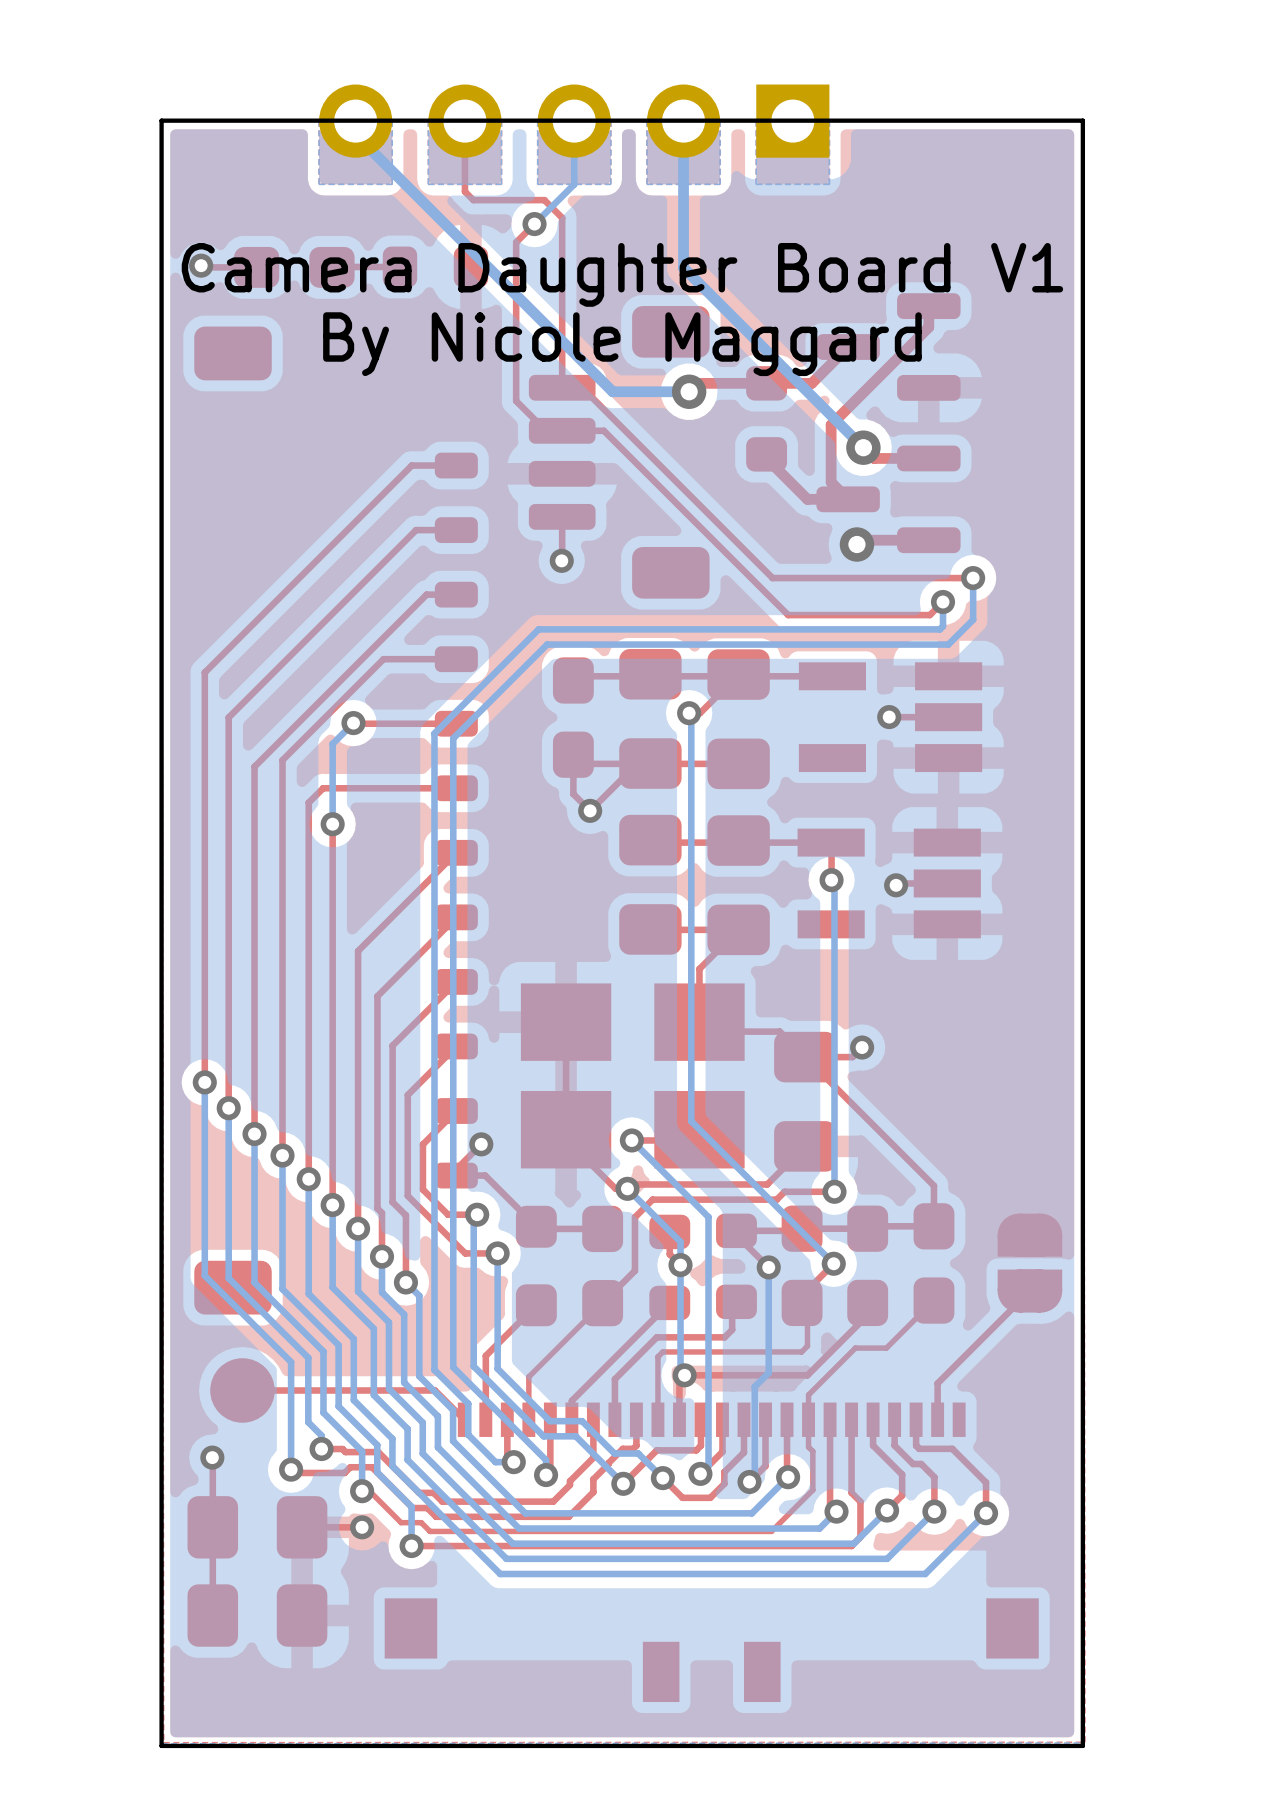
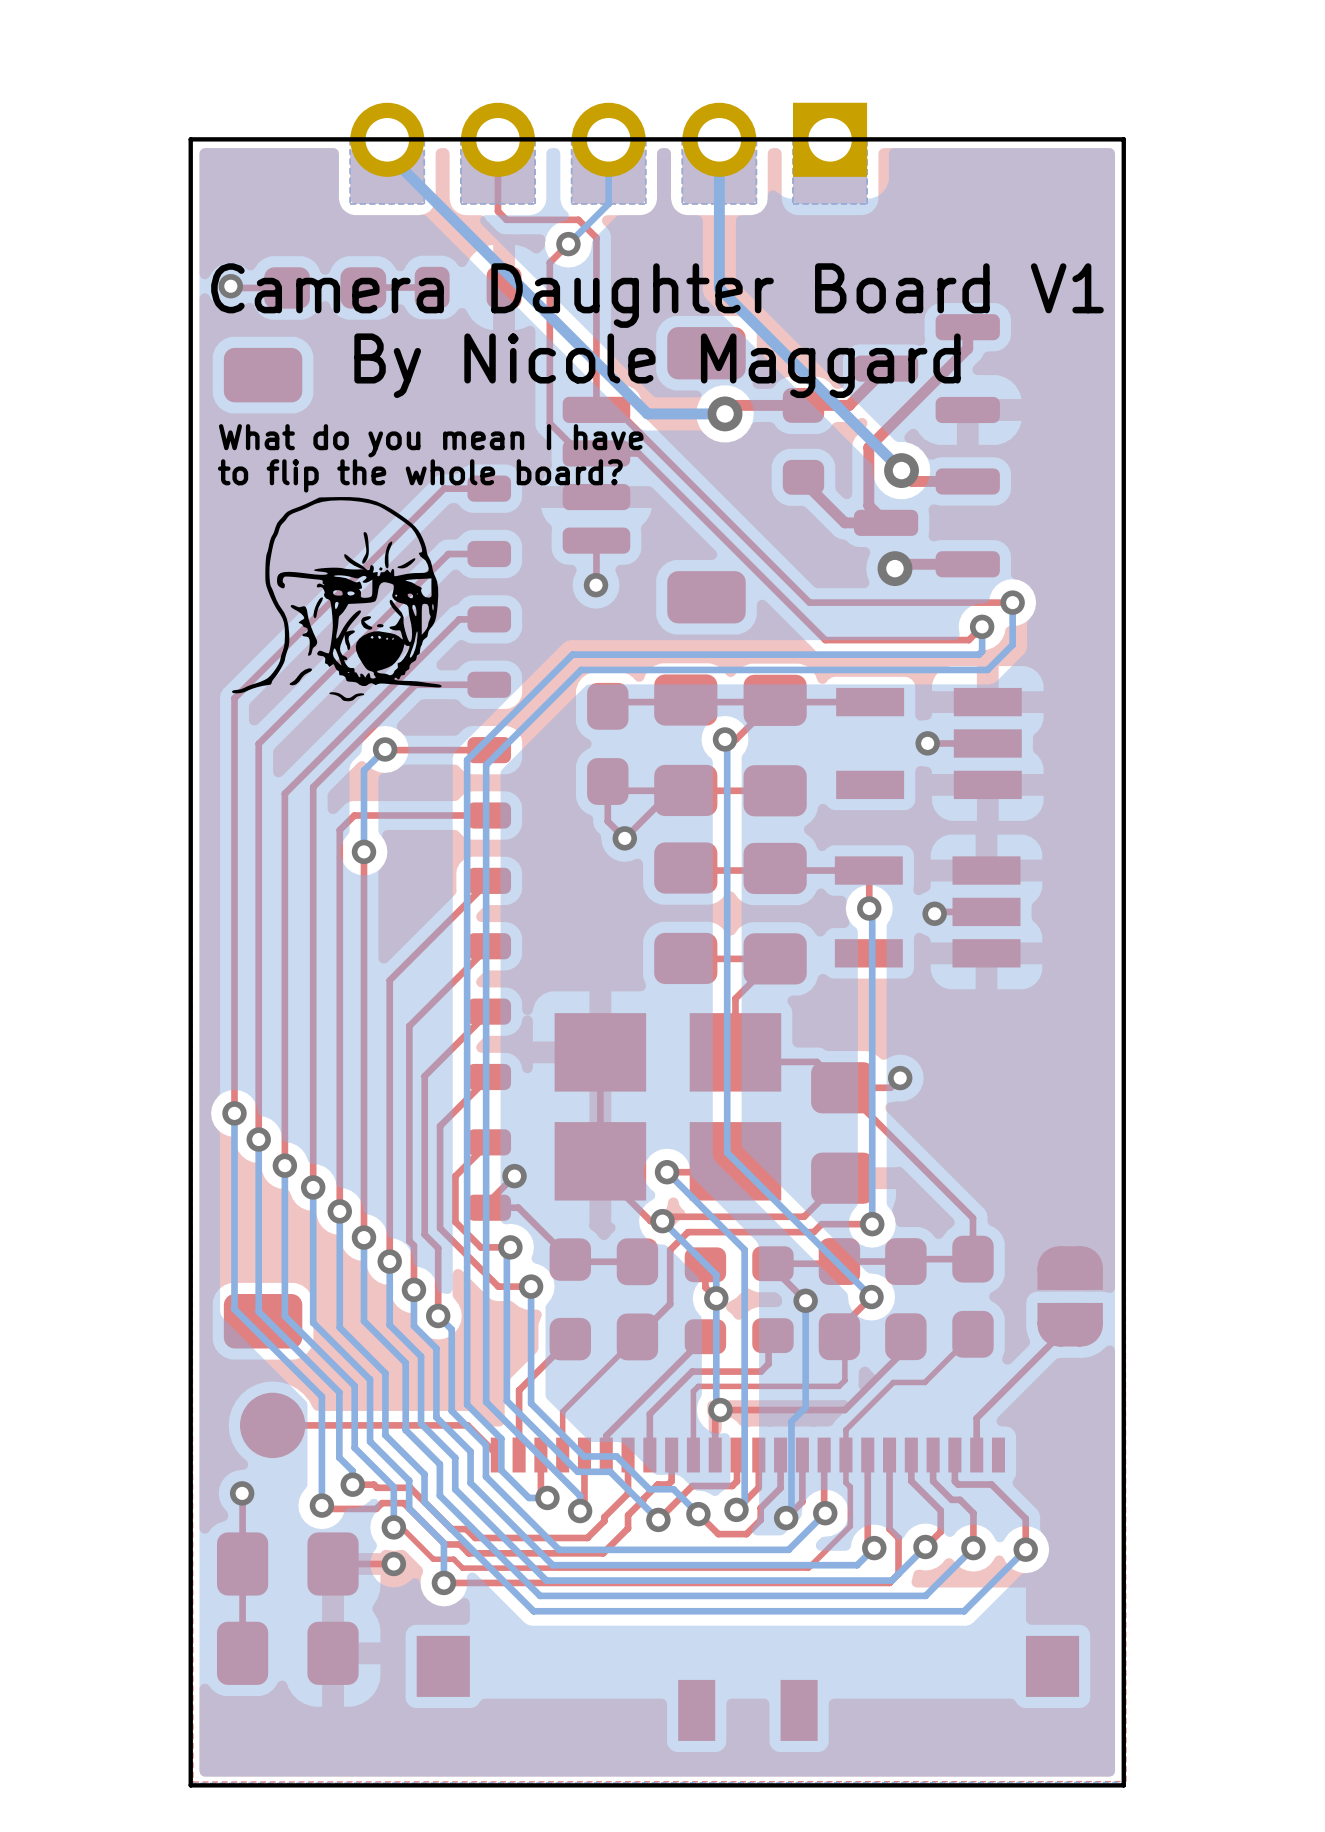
text: none -> What do you mean I have (431, 440)
text: none -> to flip the whole board? (420, 475)
drawing: none -> [232, 497, 442, 702]

